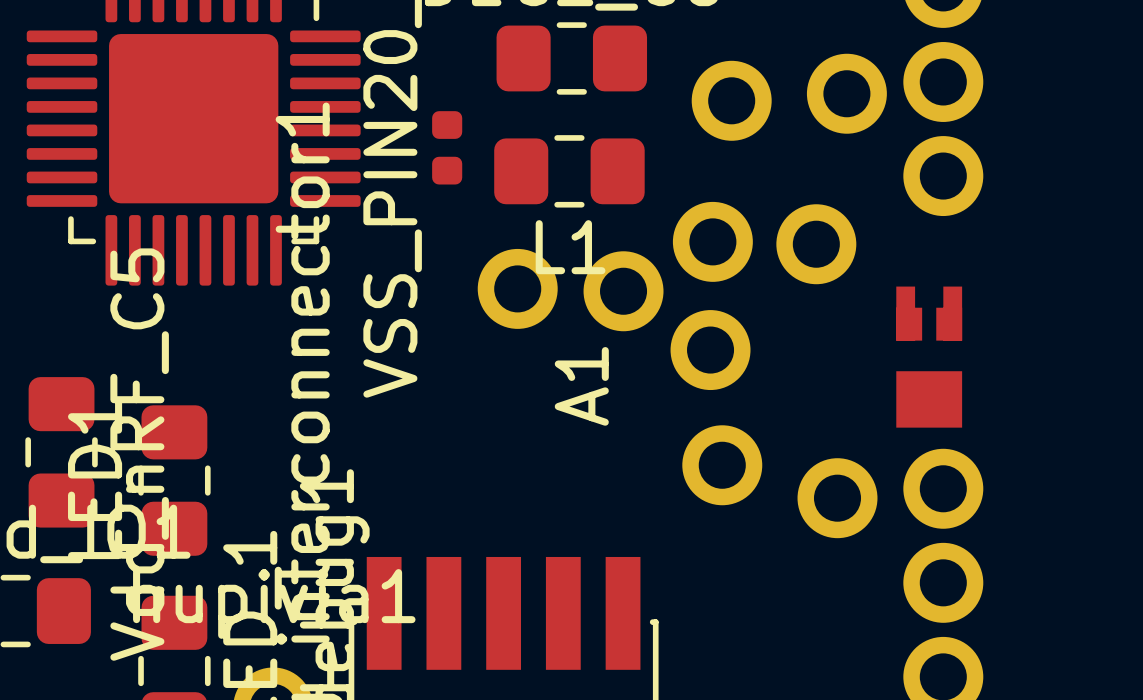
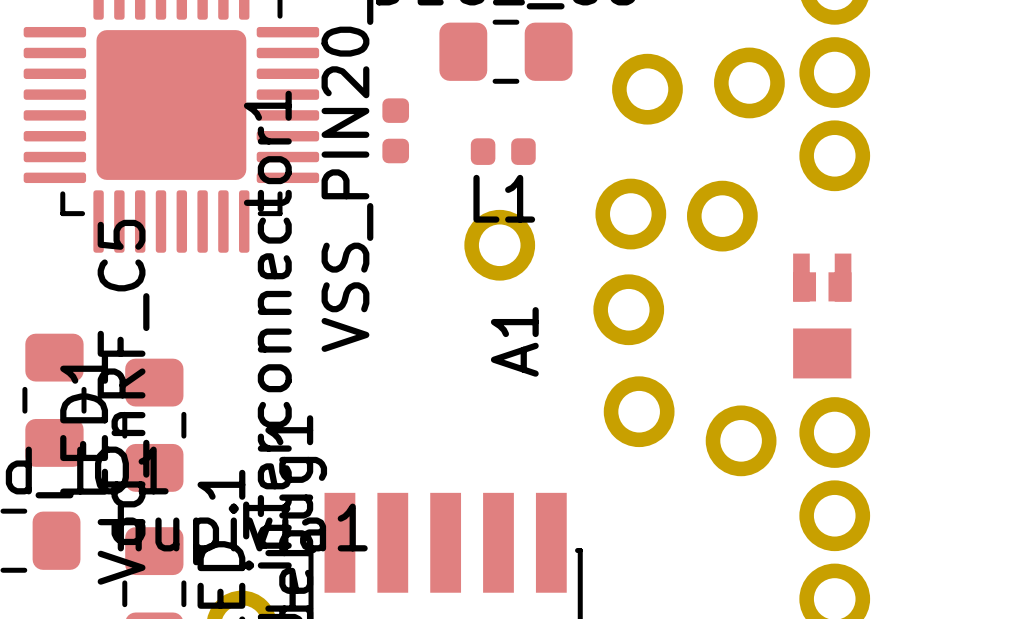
L1 footprint: [494, 135, 645, 208] -> [470, 138, 536, 165]
part: none -> (499, 245)
part: (517, 288) -> none
part: (623, 291) -> none

